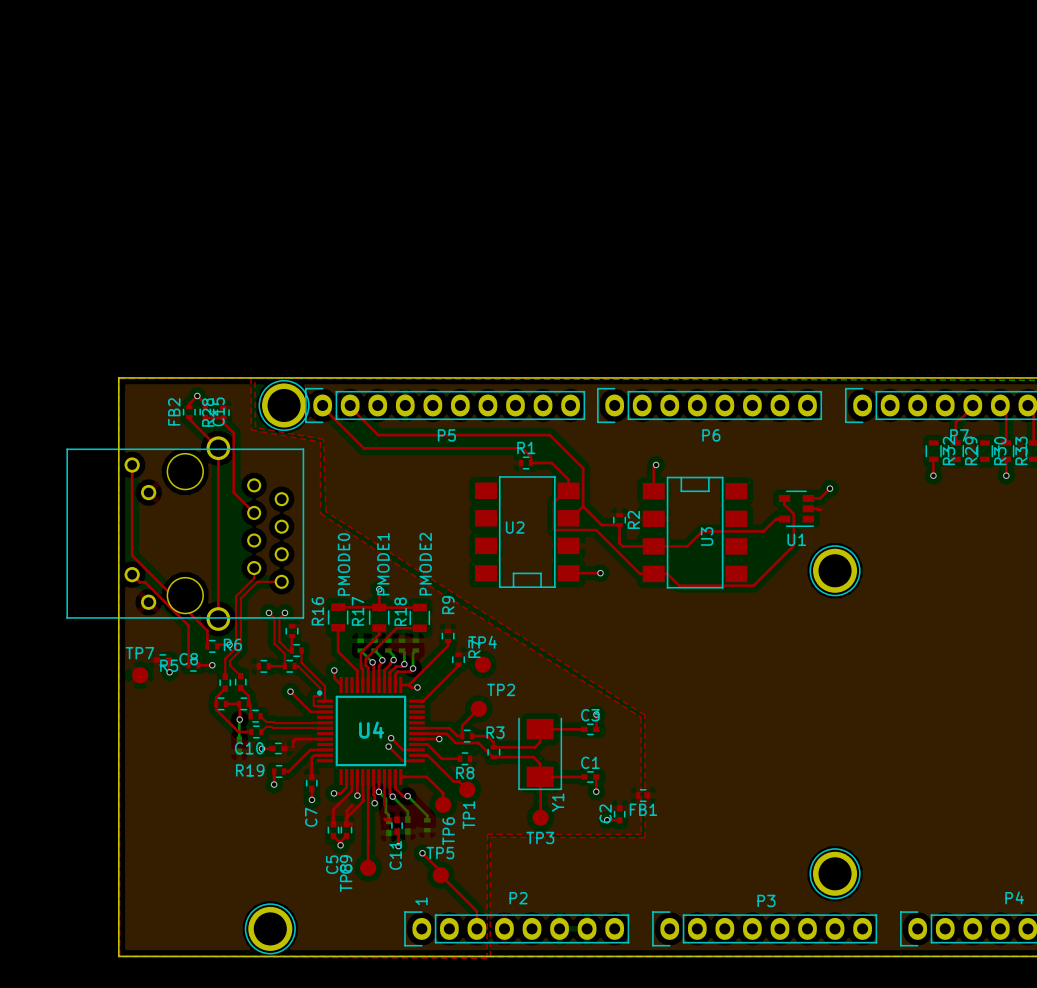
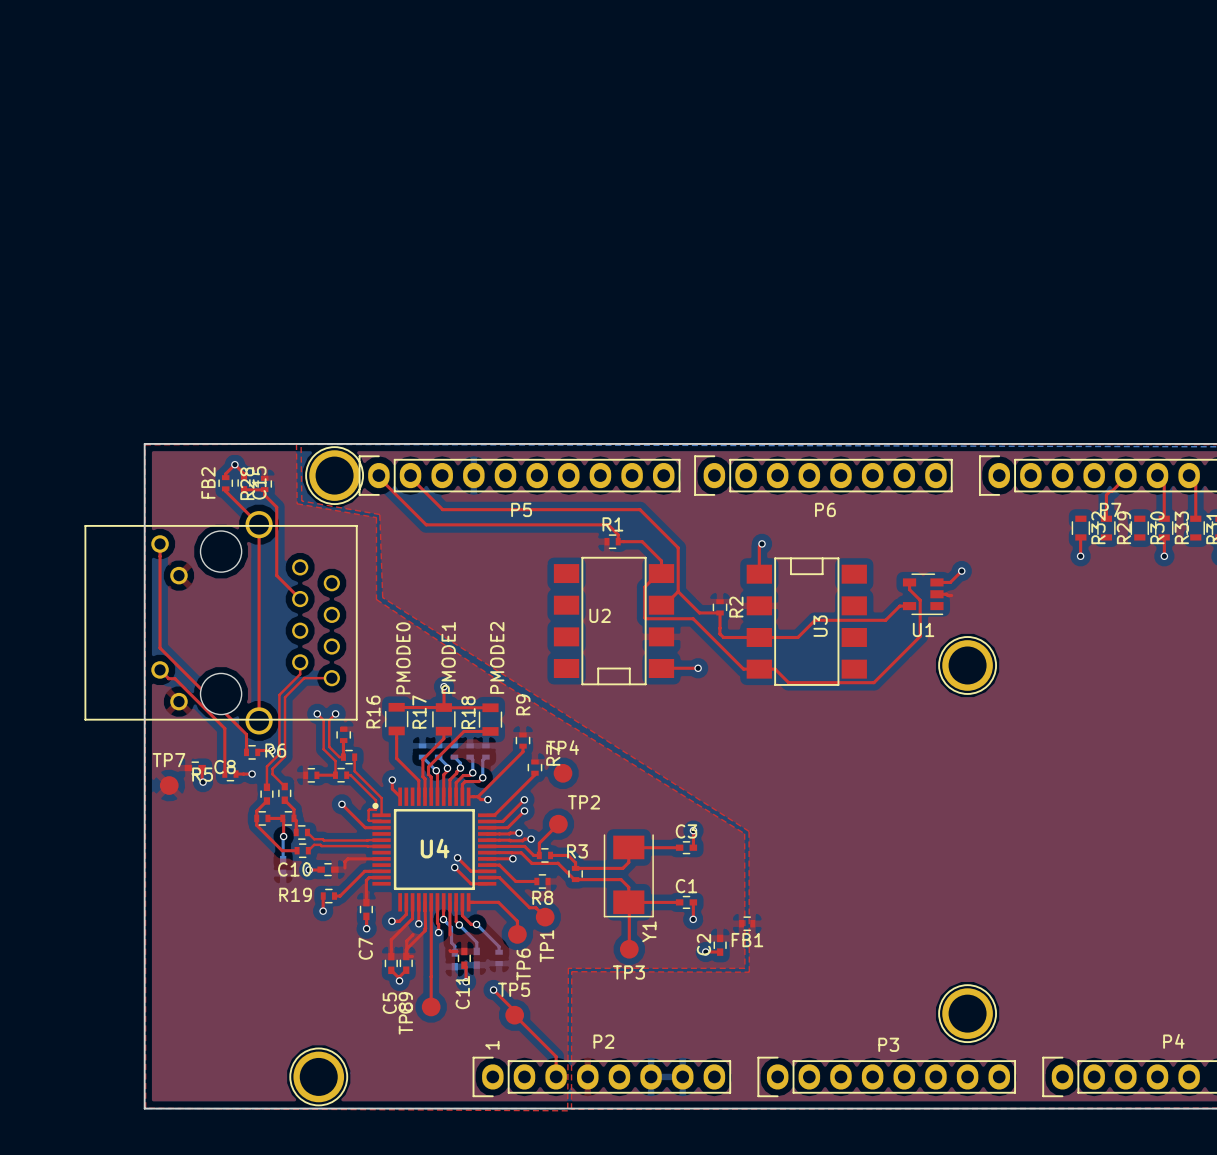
top track: none -> (524, 799) (502, 821) (487, 821)
via: none -> (524, 799)
top track: none -> (524, 810) (507, 827) (487, 827)
via: none -> (524, 810)
top track: none -> (519, 833) (487, 834)
via: none -> (519, 833)
top track: none -> (531, 839) (487, 840)
via: none -> (531, 839)

